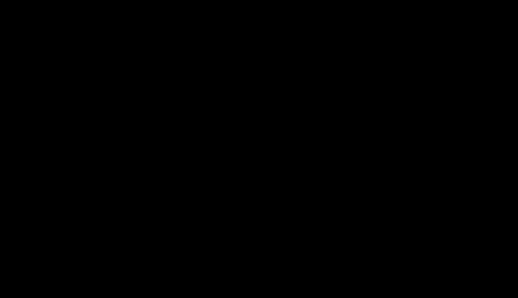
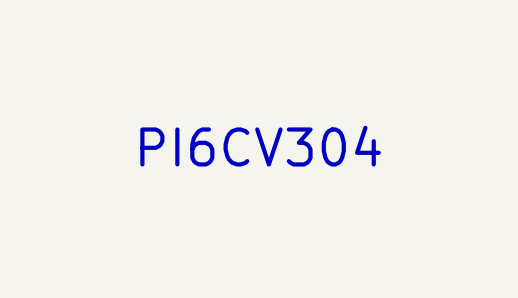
text: none -> PI6CV304 (260, 146)

